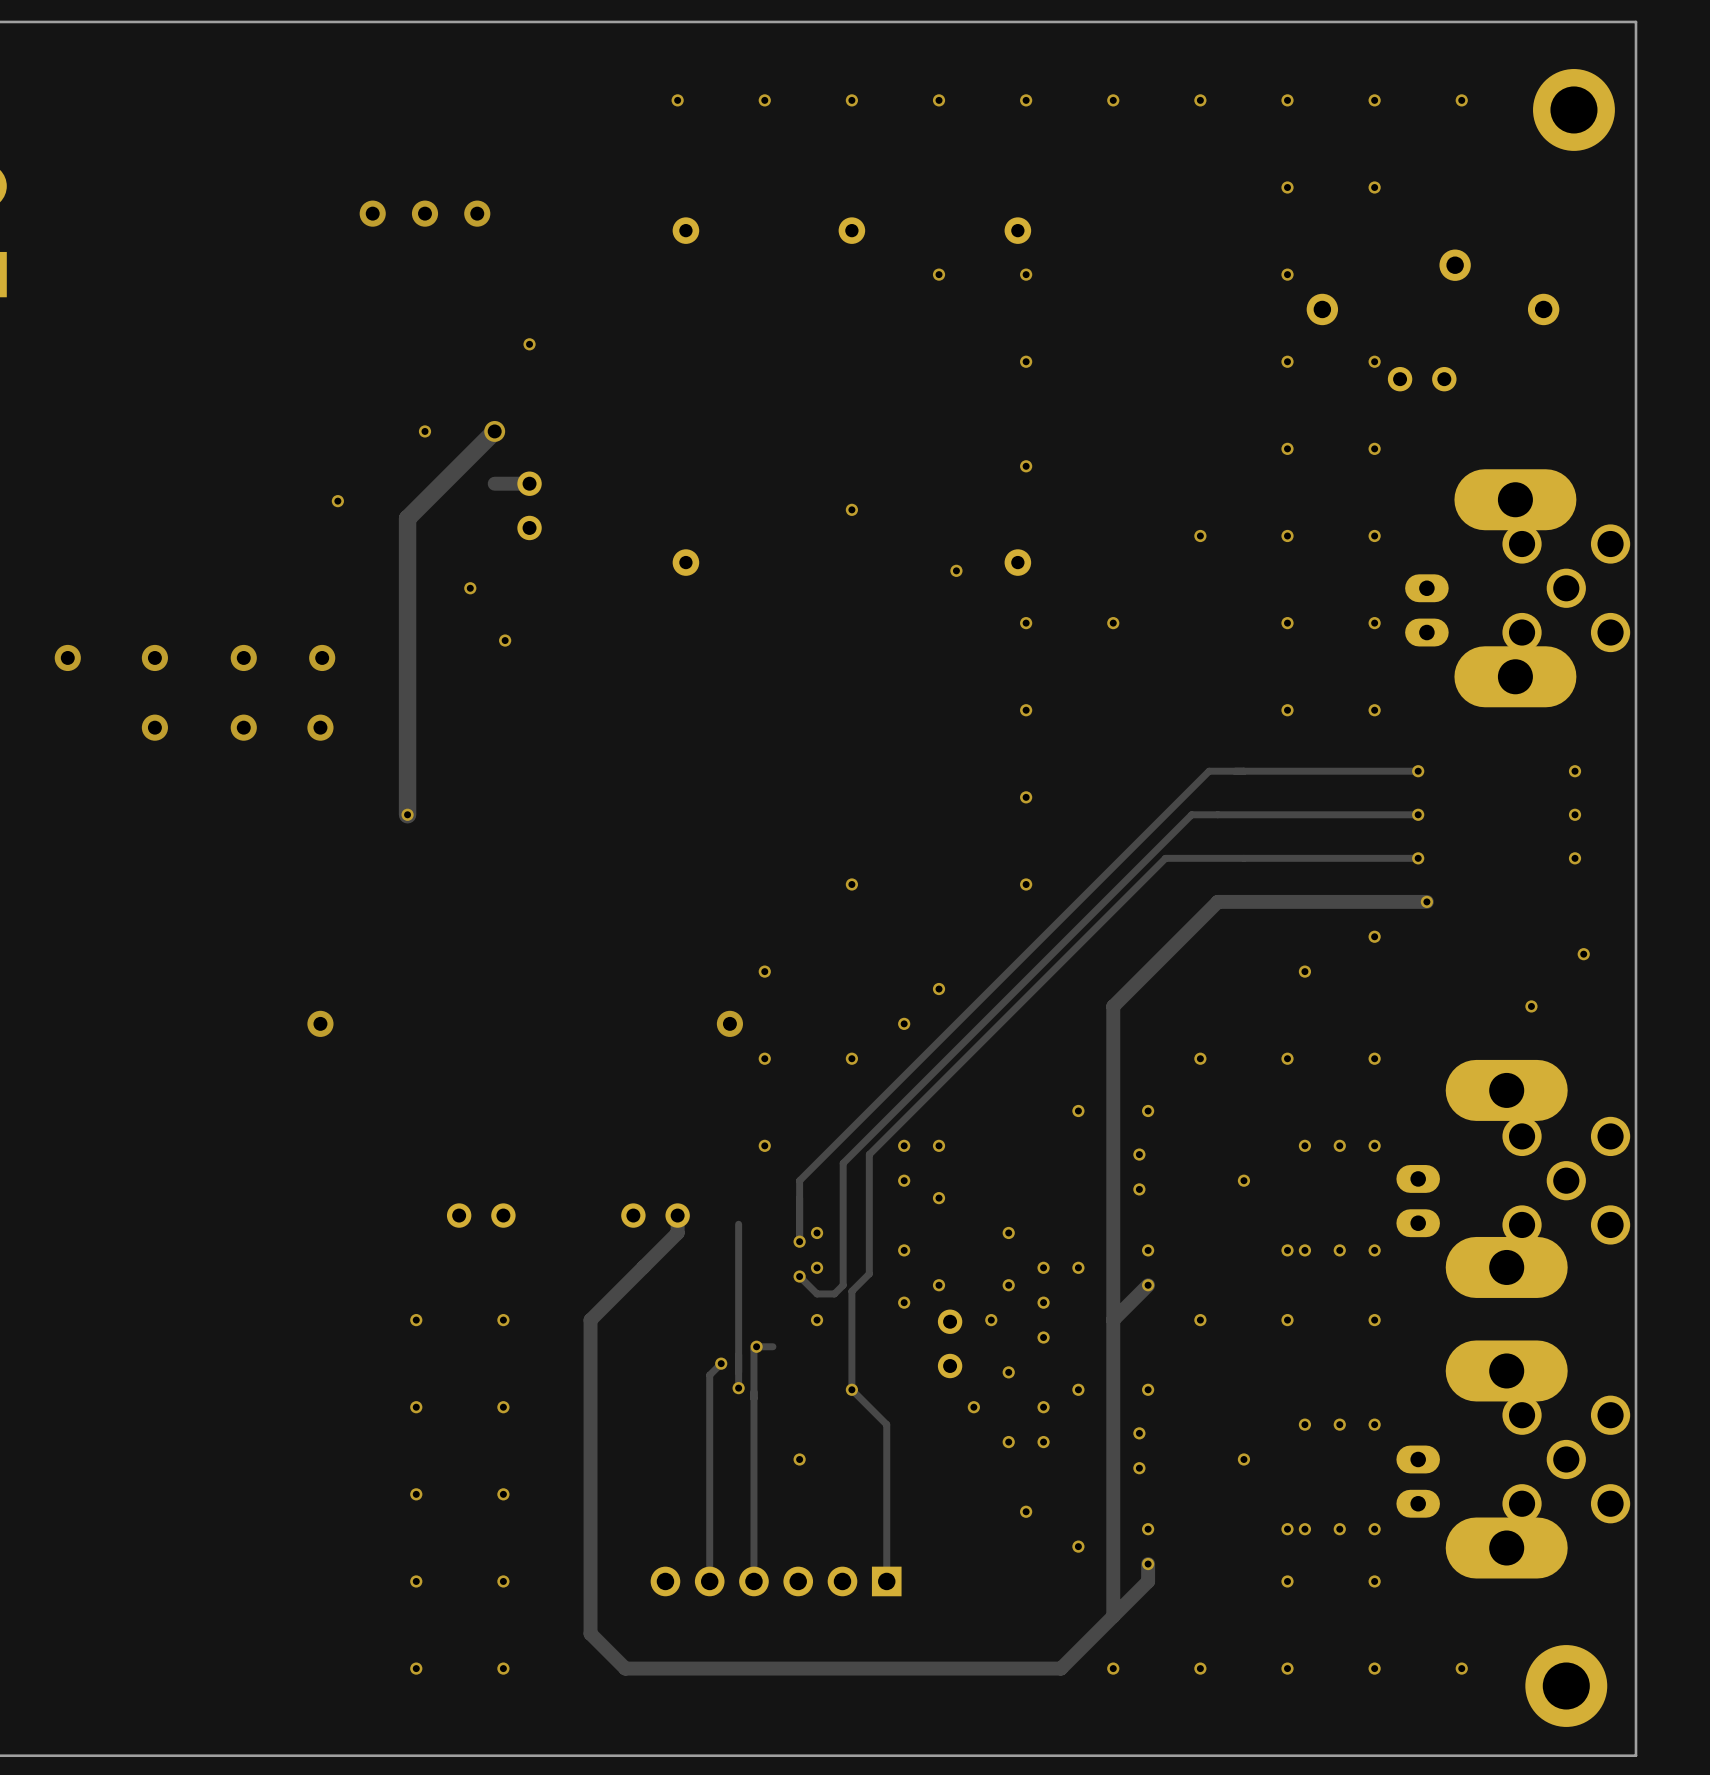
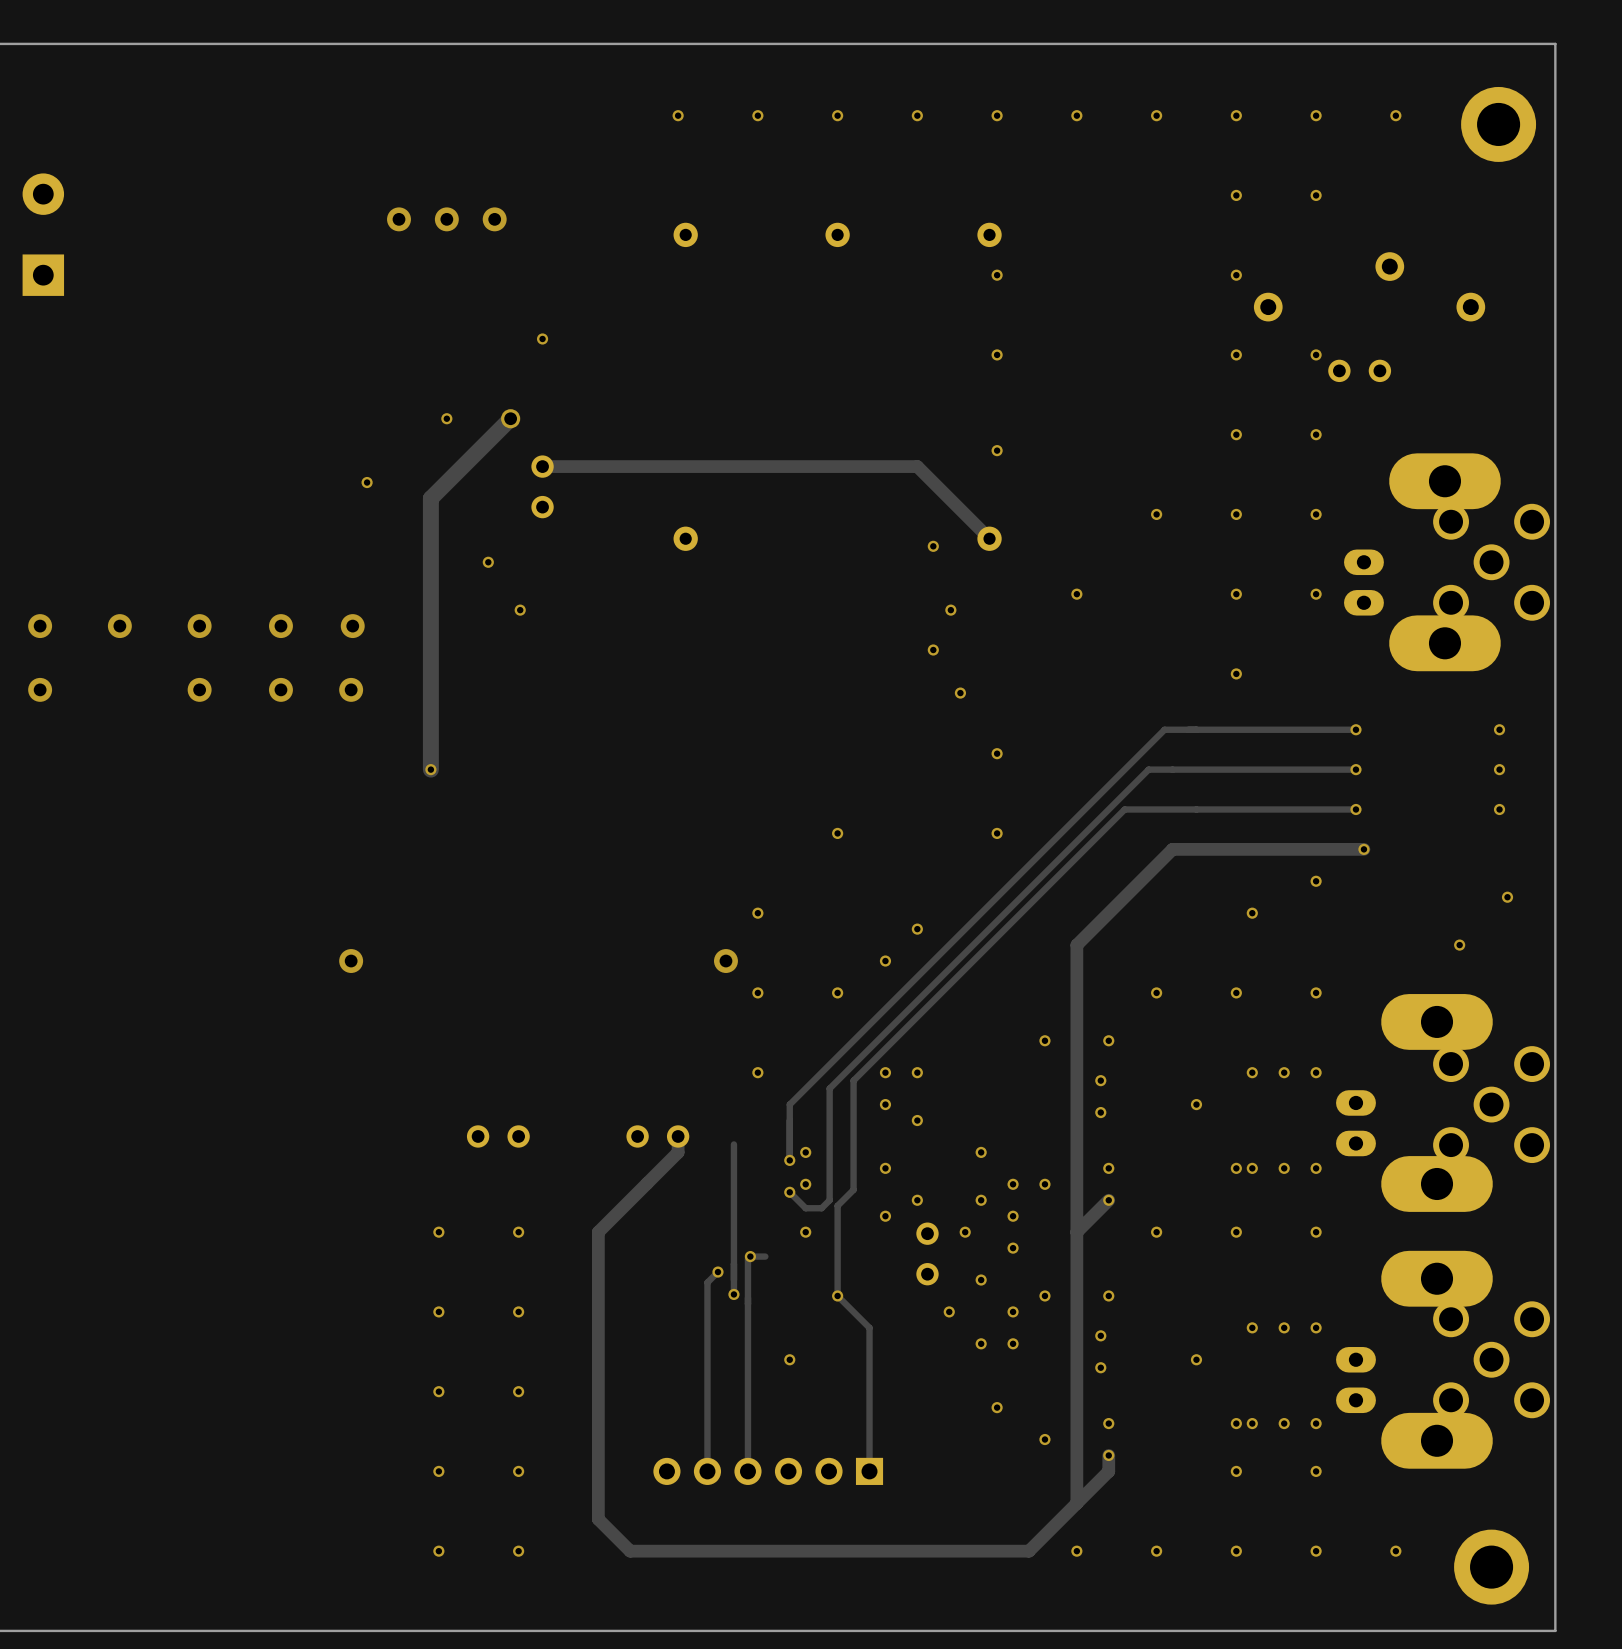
via: (939, 274) -> none
track: (529, 483) (494, 483) -> (542, 466) (917, 466) (989, 538)
via: (851, 509) -> none
via: (1026, 623) -> none
via: none -> (950, 610)
via: none -> (933, 650)
via: (1026, 710) -> none
via: (1374, 710) -> none
via: none -> (960, 693)

